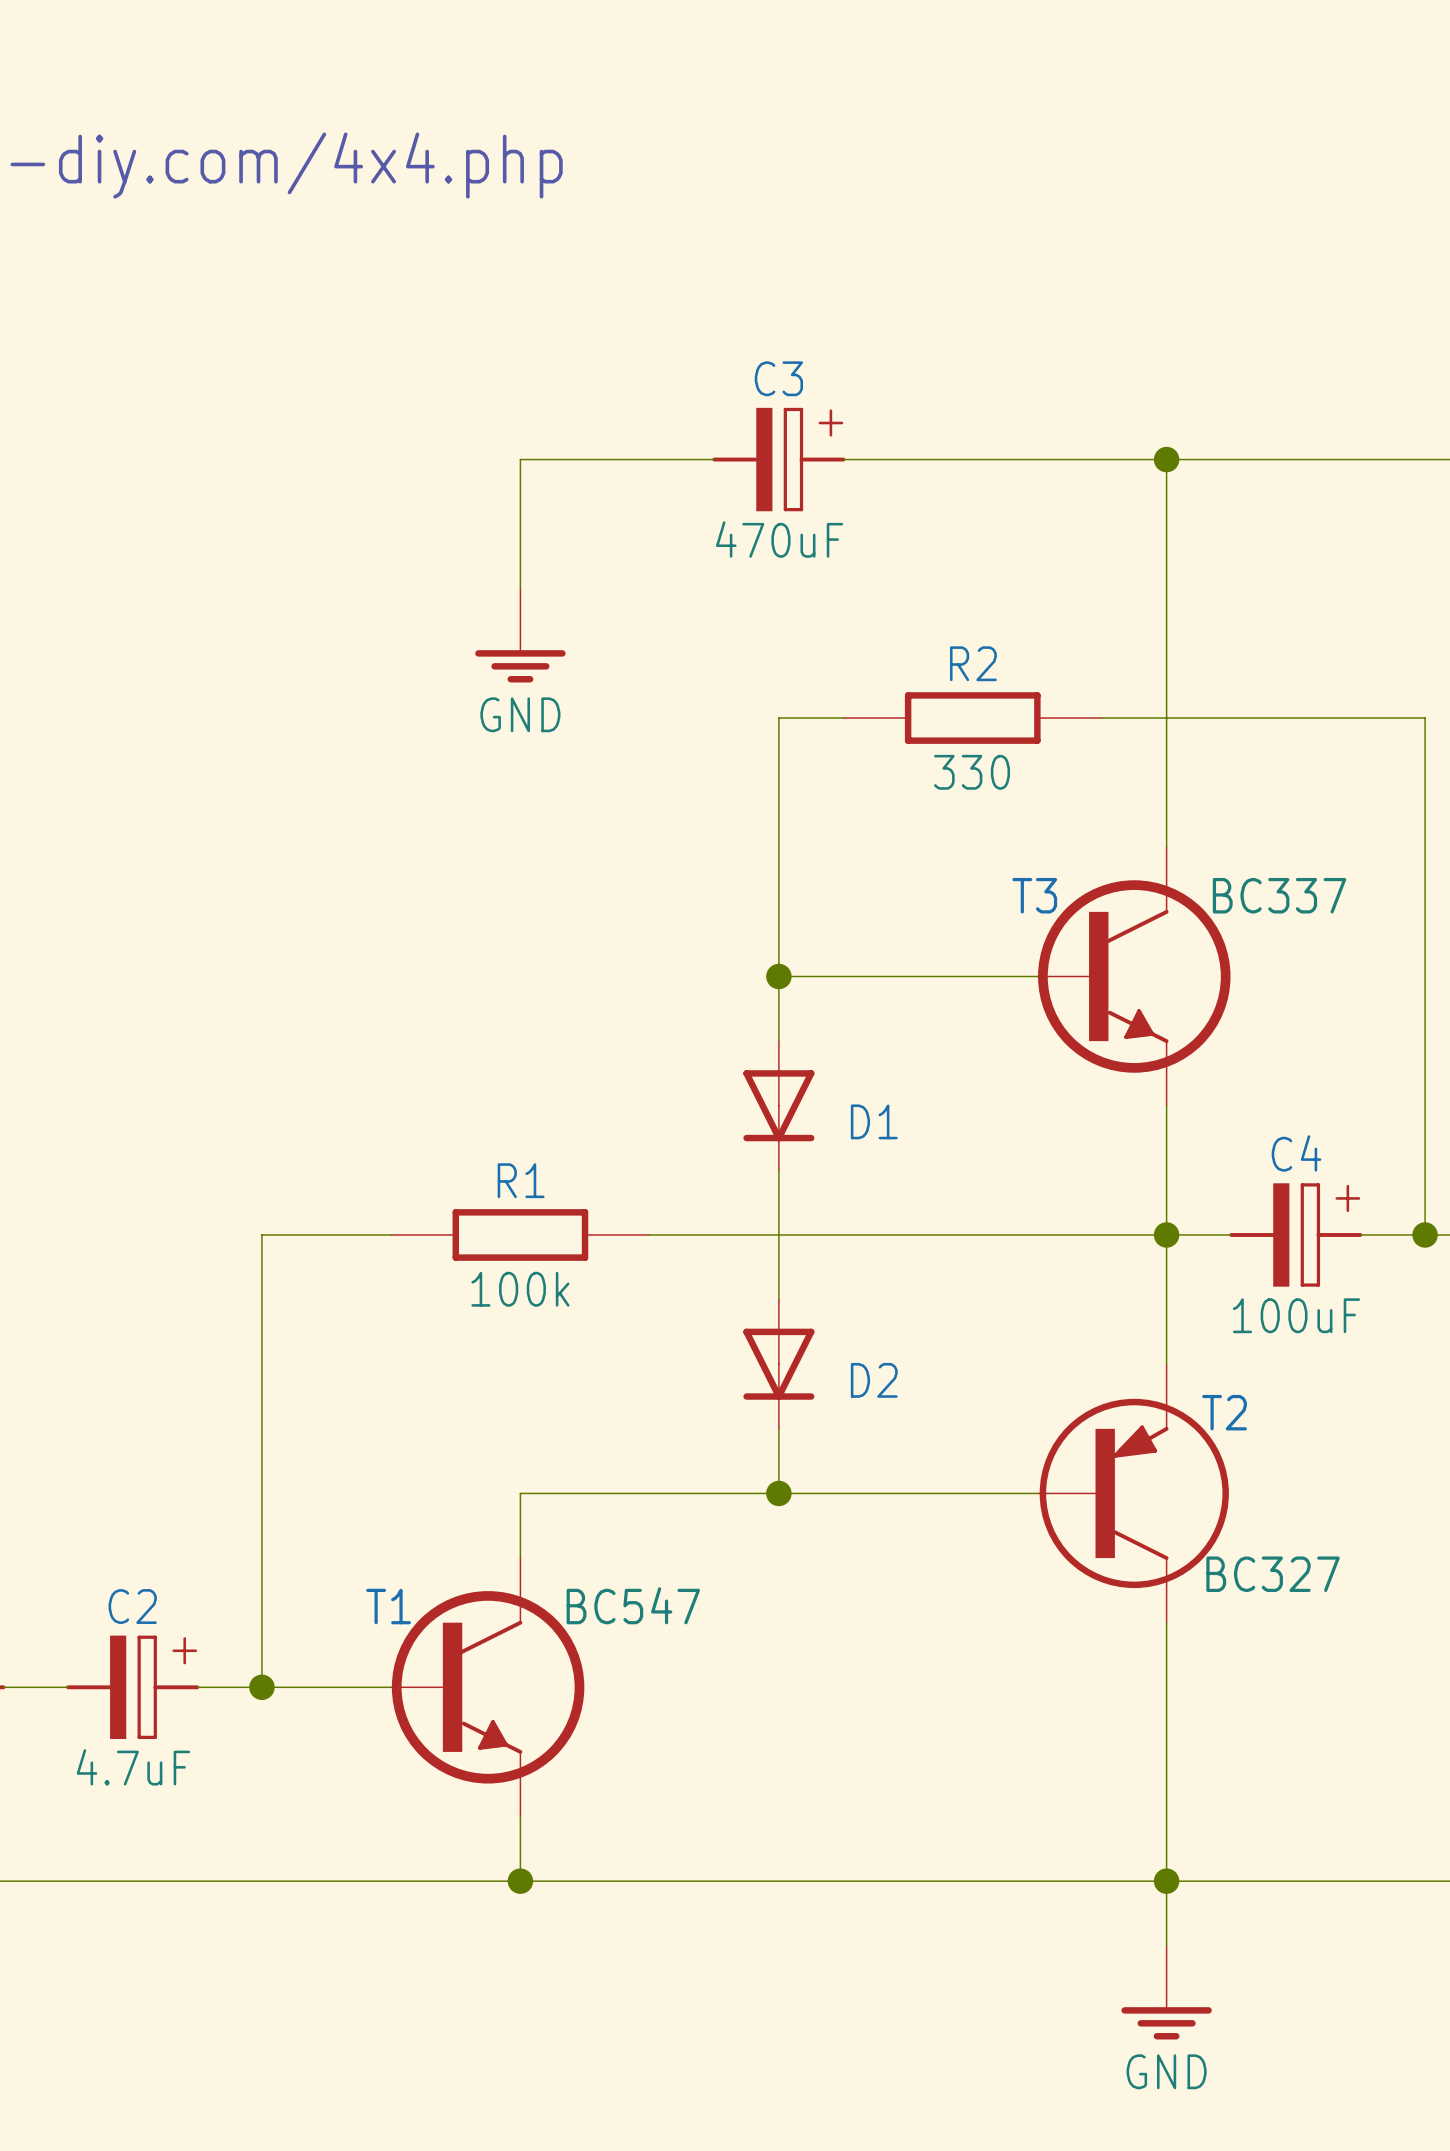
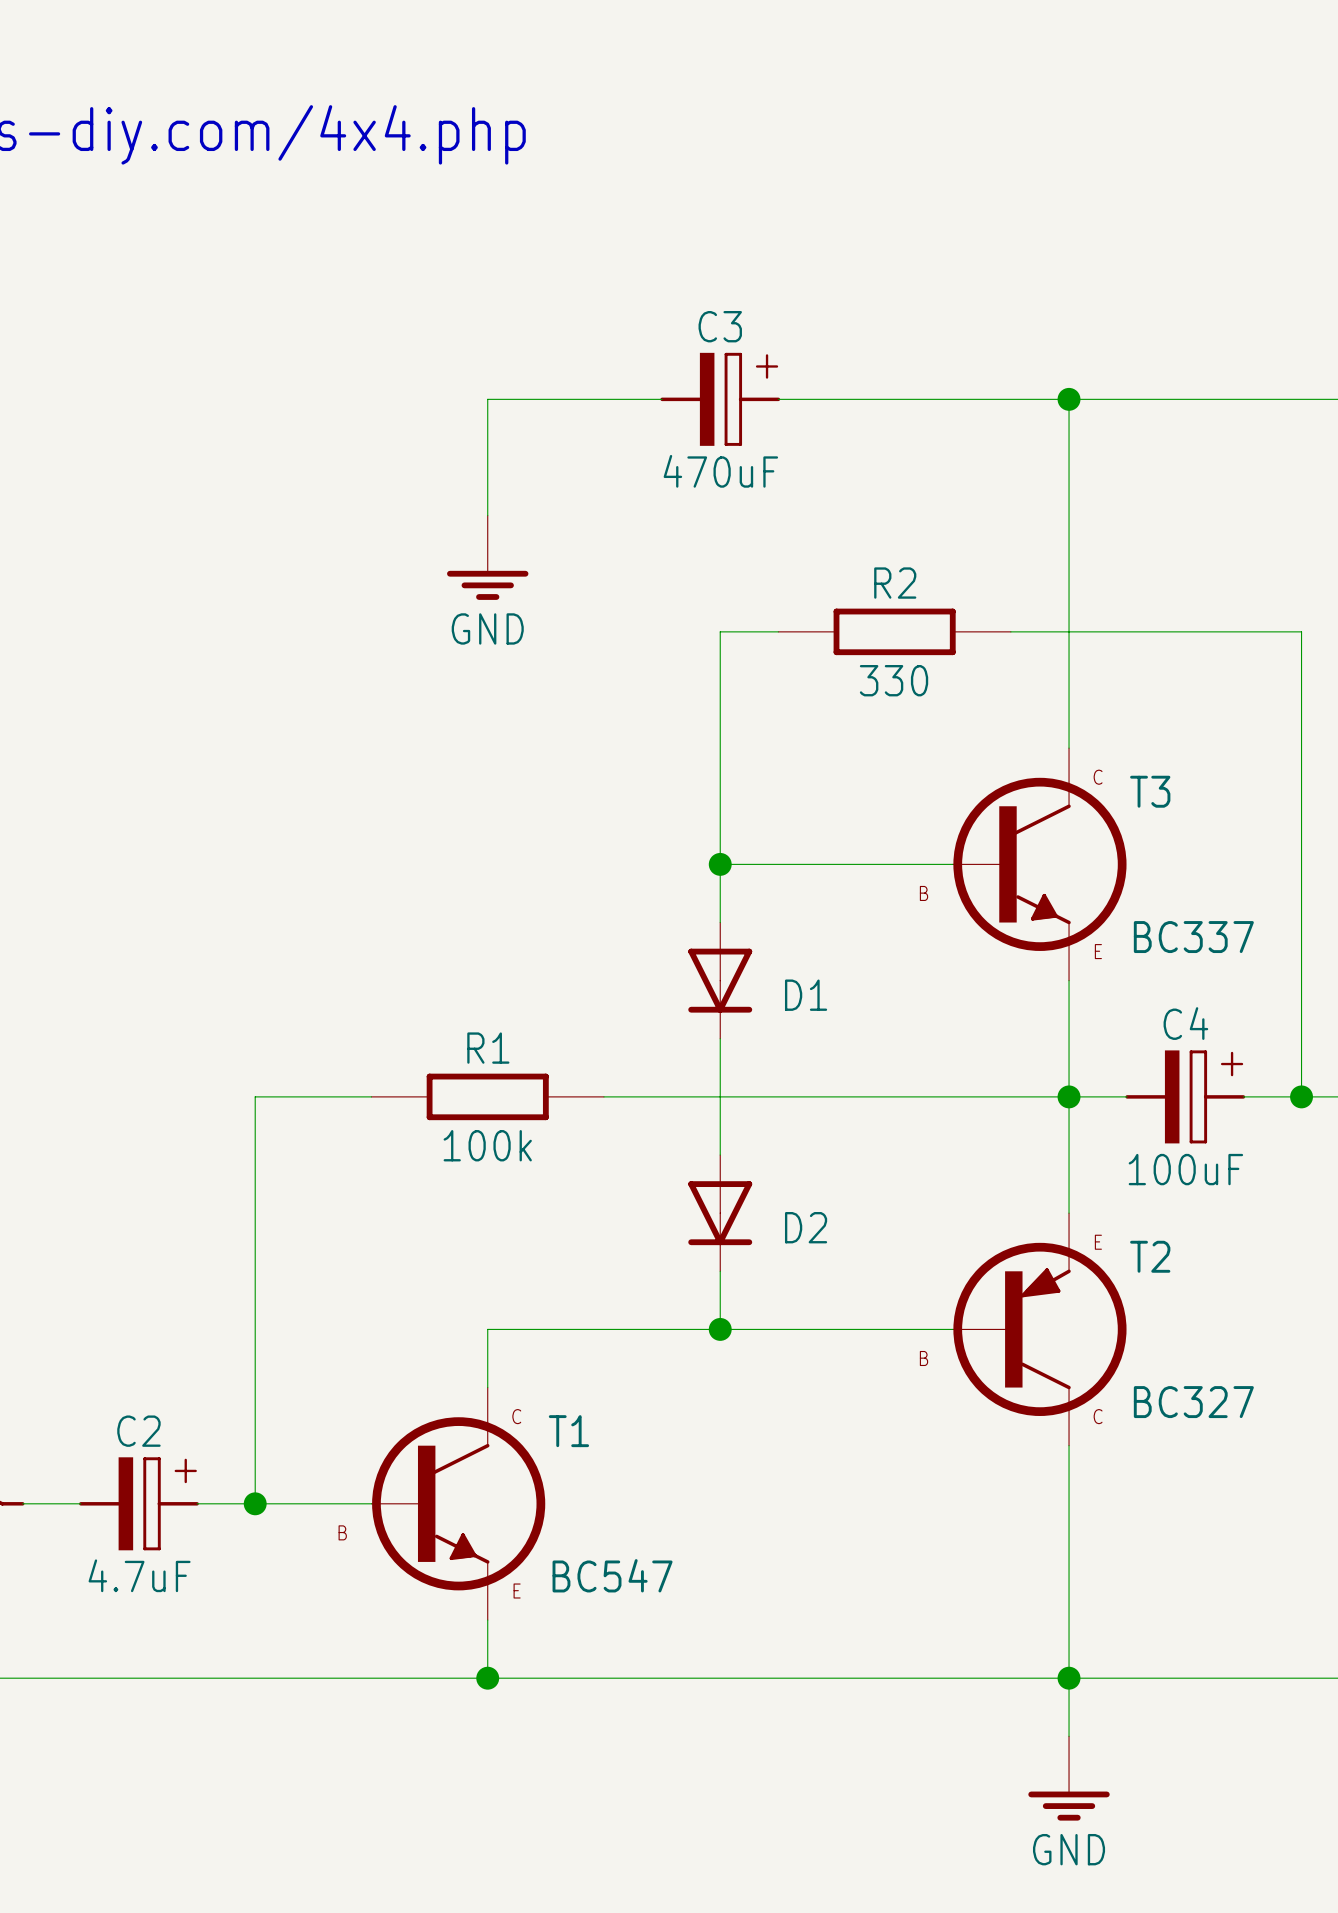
T3 text: none -> C (1098, 777)
T3 name position: T3 (1034, 895) -> T3 (1150, 791)
T3 value position: BC337 (1279, 895) -> BC337 (1193, 937)
T3 text: none -> B (923, 893)
T3 text: none -> E (1098, 951)
T2 symbol: [1037, 1364, 1229, 1623] -> [952, 1213, 1127, 1446]
T1 text: none -> C (516, 1416)
T1 value position: BC547 (633, 1605) -> BC547 (612, 1575)
T1 name position: T1 (388, 1606) -> T1 (568, 1431)
T1 text: none -> B (342, 1532)
T1 text: none -> E (517, 1591)

